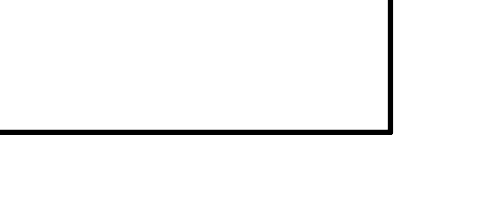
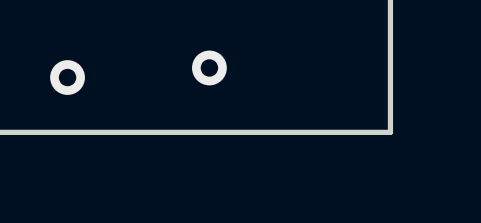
via: none -> (209, 67)
via: none -> (67, 77)

